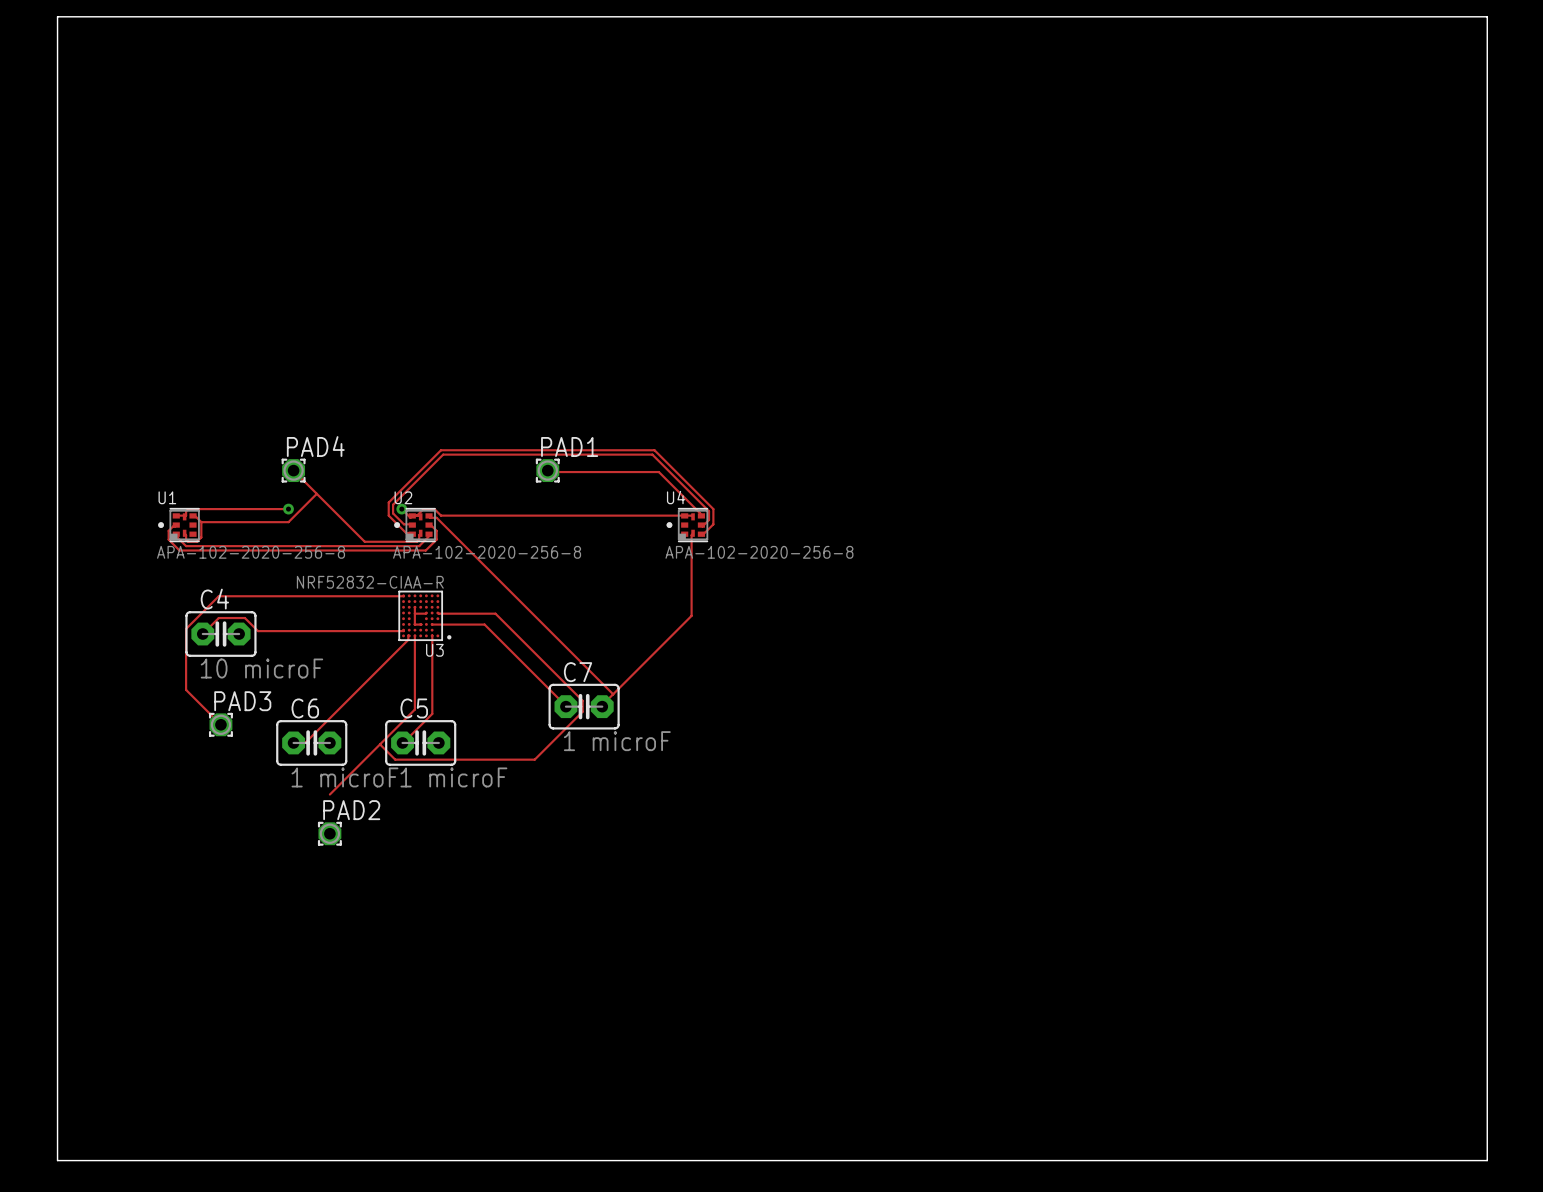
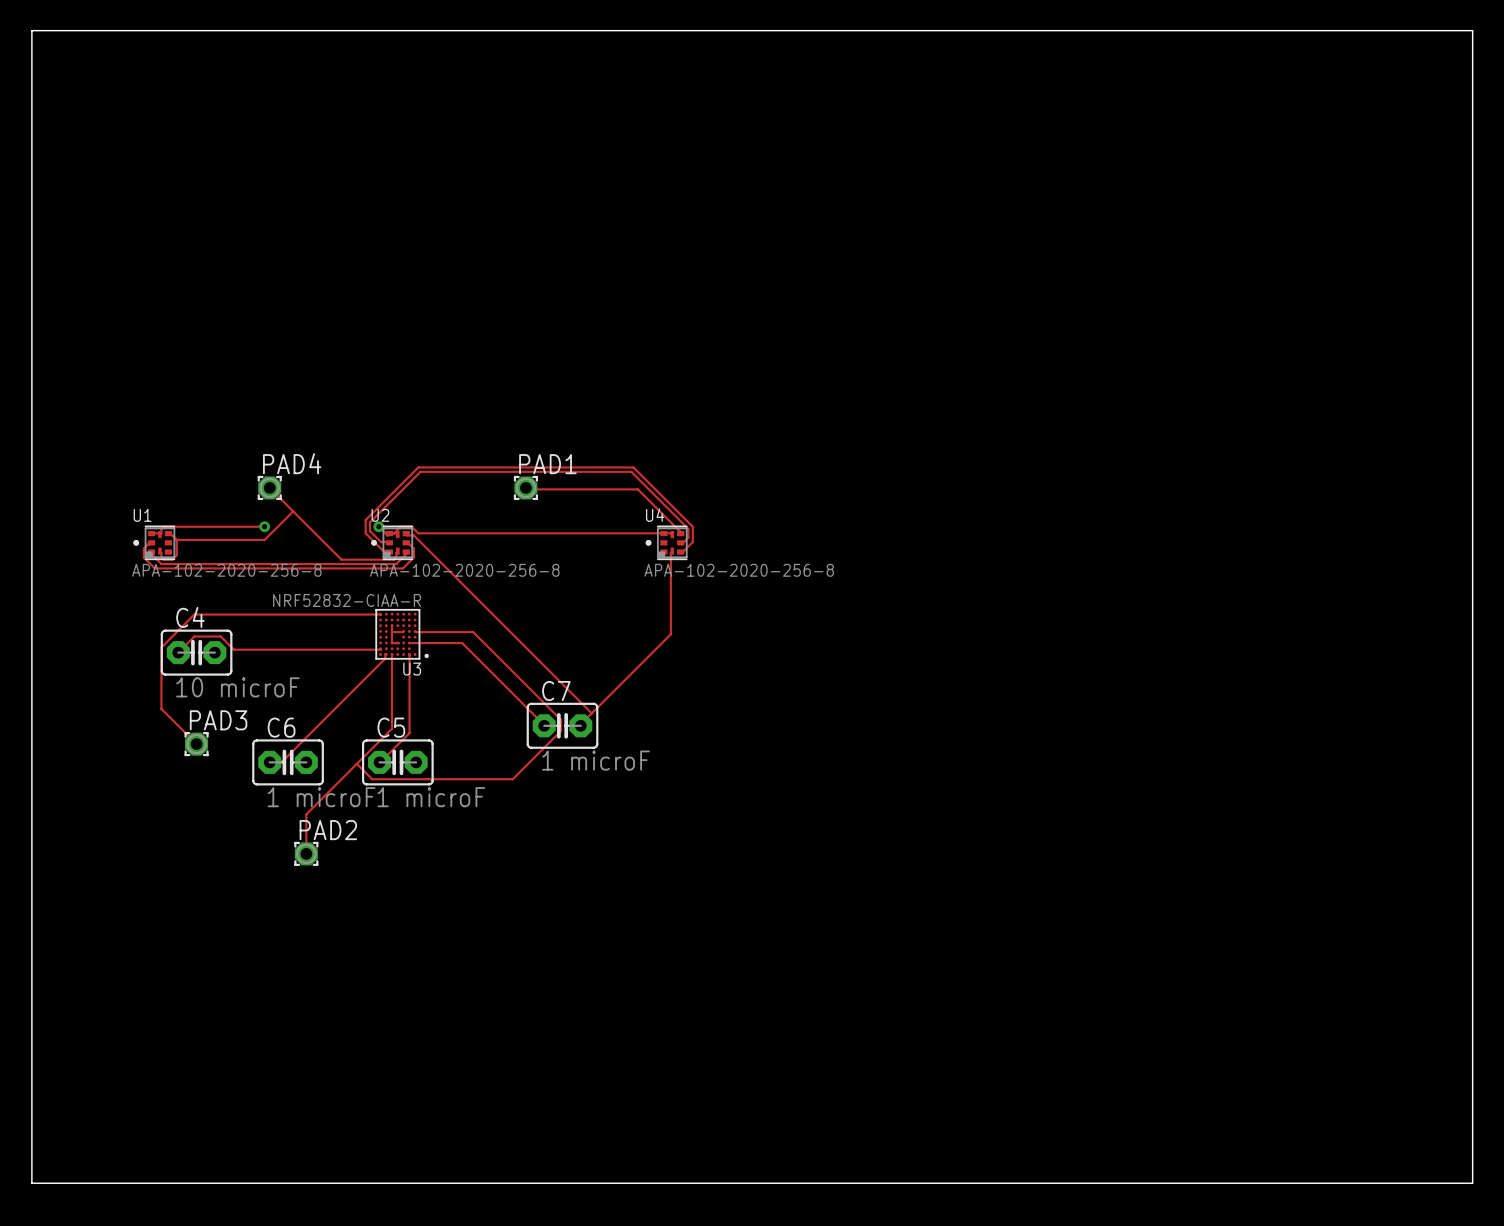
track: none -> (306, 814) (306, 853)

